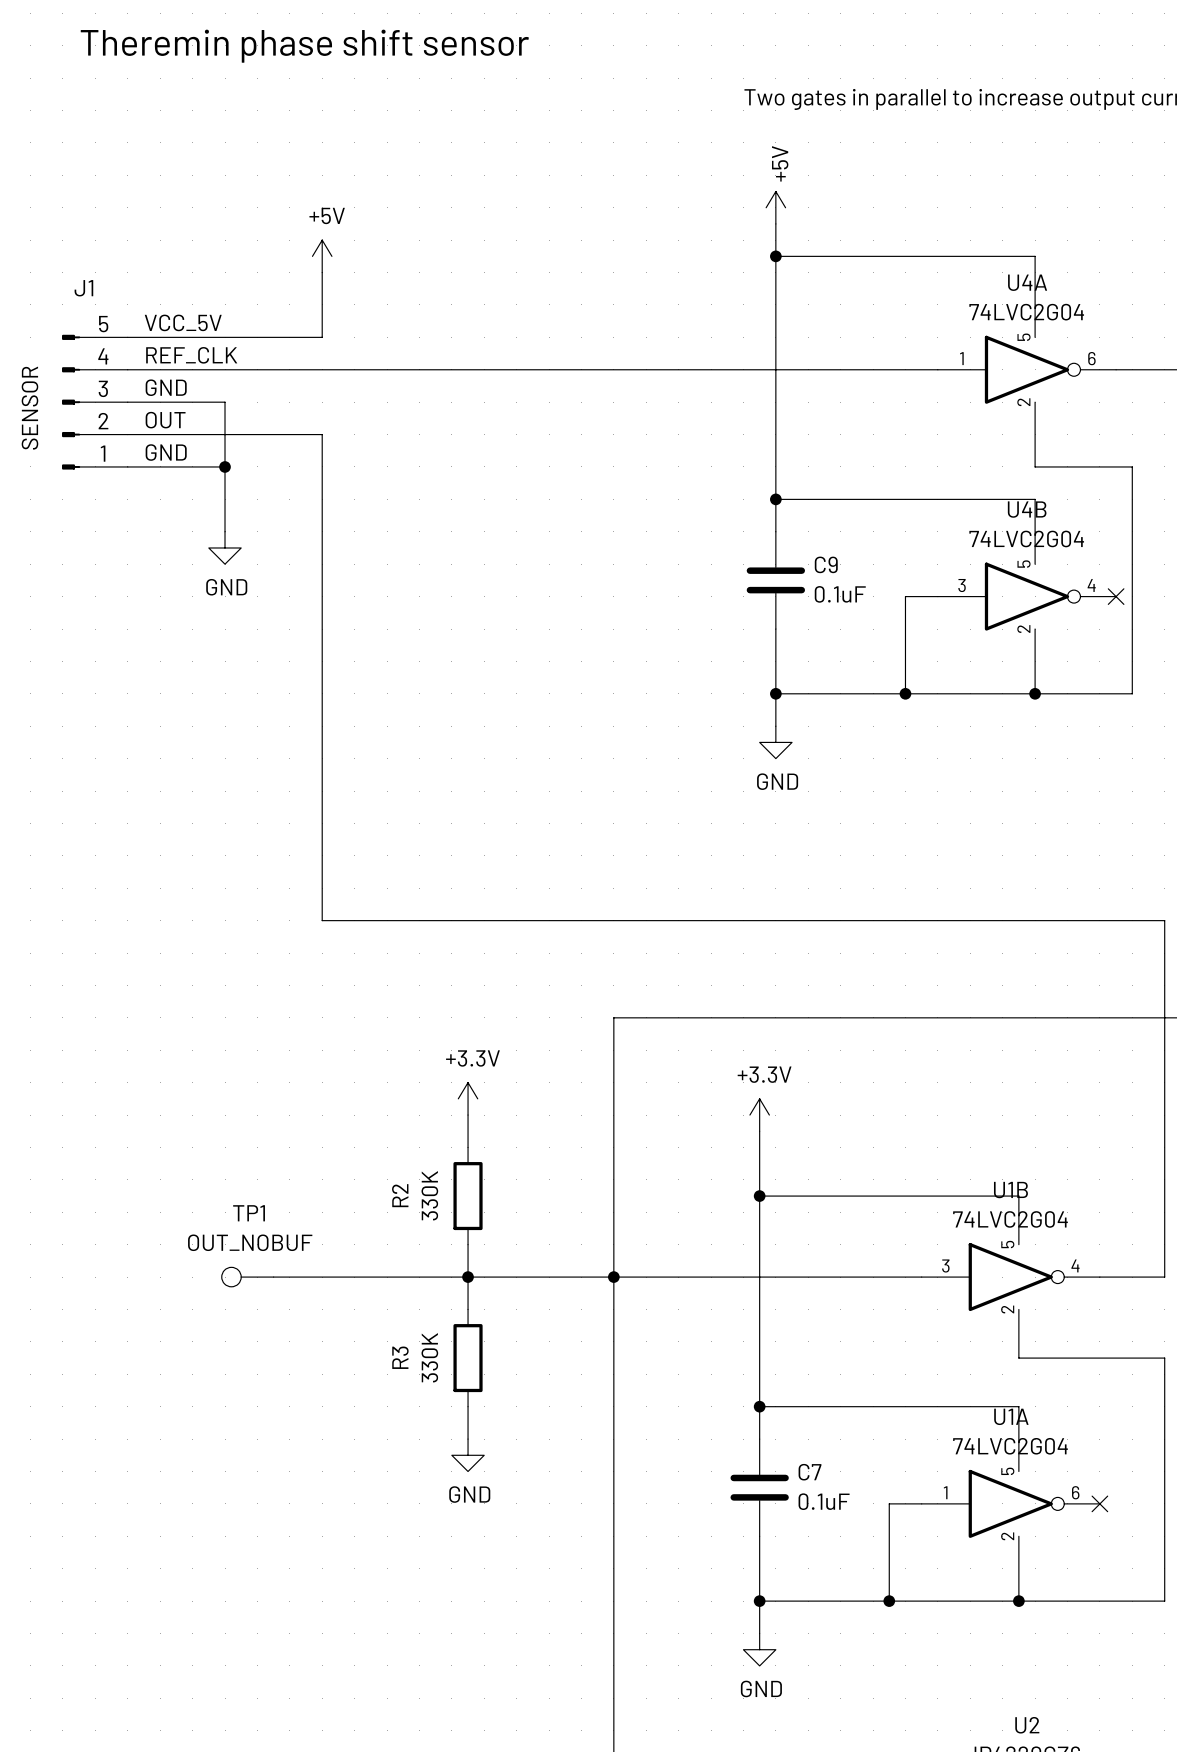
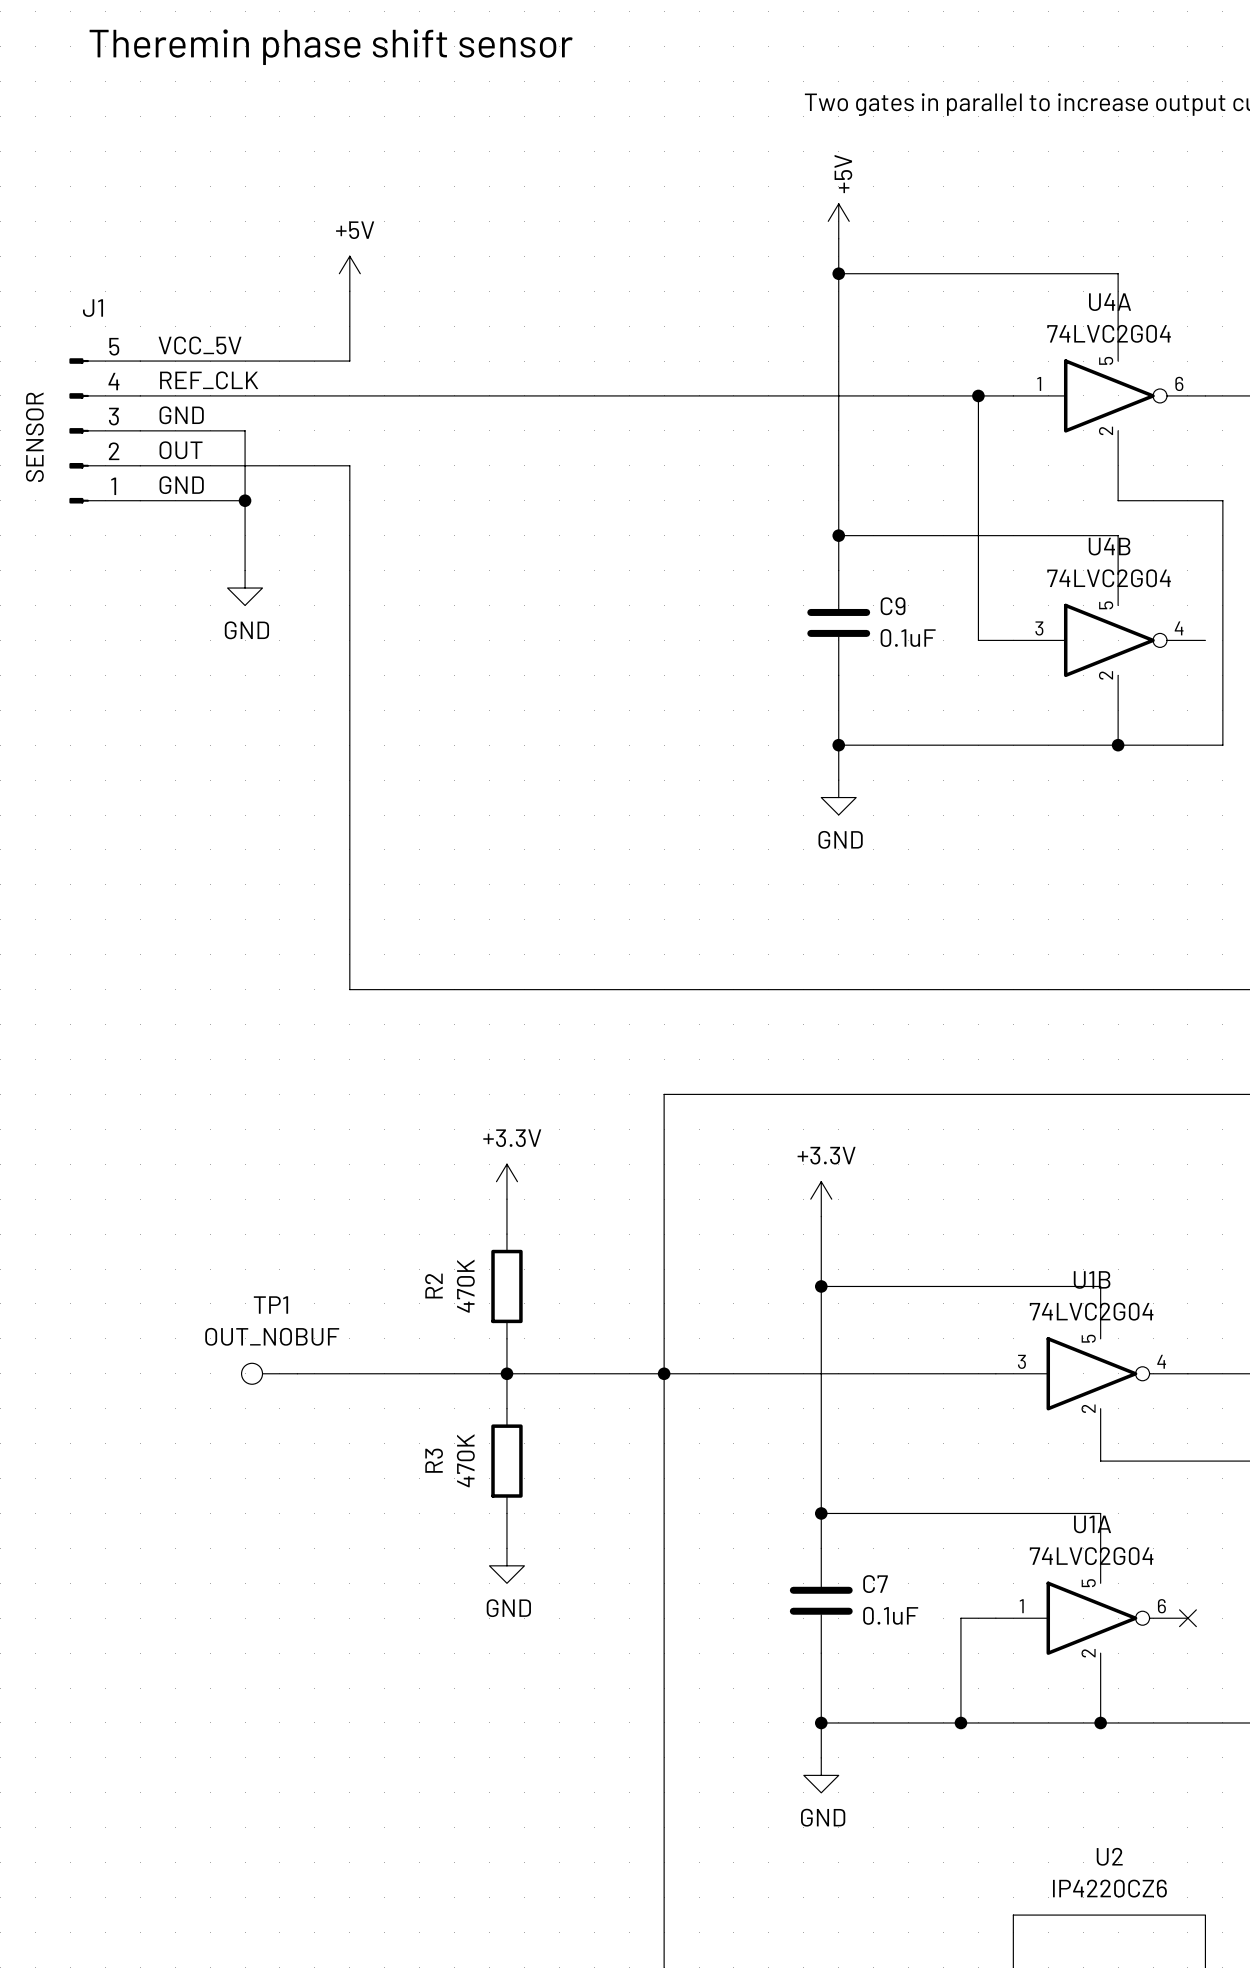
junction: none -> (978, 395)
wire: (905, 596) (905, 693) -> (978, 640) (978, 395)
no-connect mark: (1116, 596) -> none
junction: (905, 693) -> none
R2 value: 330K (429, 1195) -> 470K (465, 1286)
R3 value: 330K (429, 1357) -> 470K (465, 1460)

